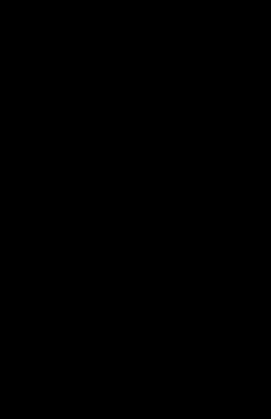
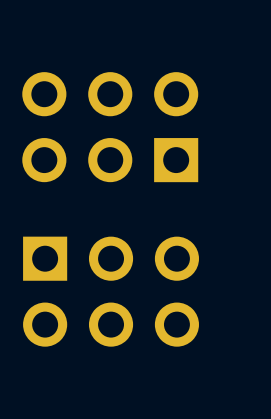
part: none -> (110, 127)
part: none -> (111, 291)

